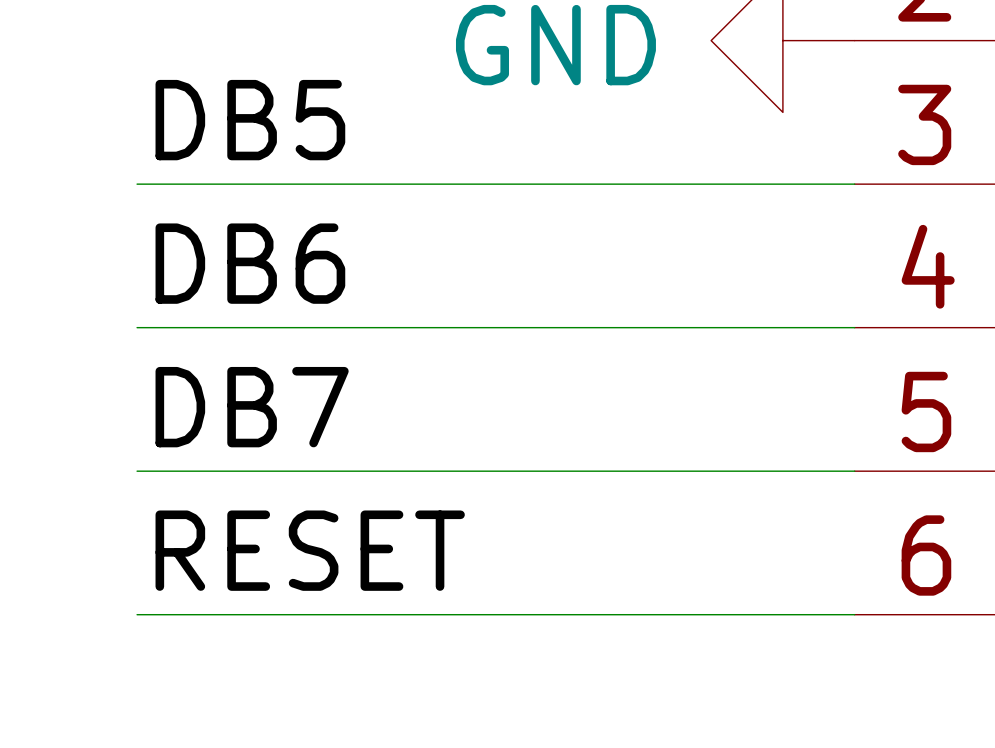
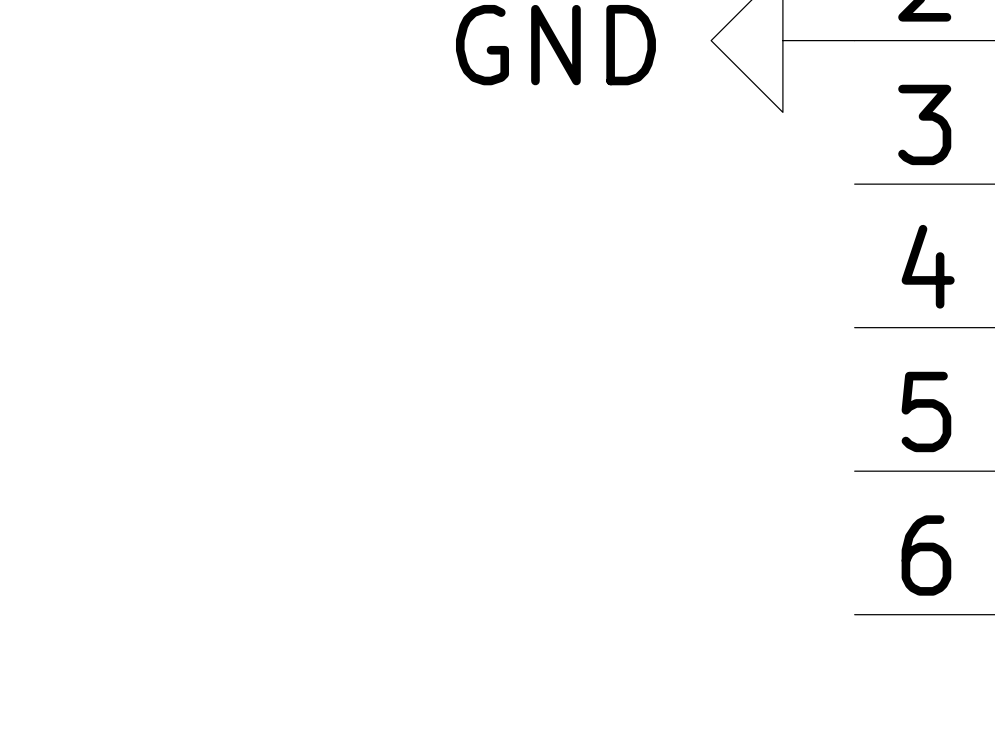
label: DB5 (250, 120) -> none
wire: (137, 184) (854, 184) -> none
label: DB6 (250, 263) -> none
wire: (137, 327) (854, 327) -> none
label: DB7 (252, 407) -> none
wire: (137, 471) (854, 471) -> none
label: RESET (310, 550) -> none
wire: (137, 614) (854, 614) -> none

